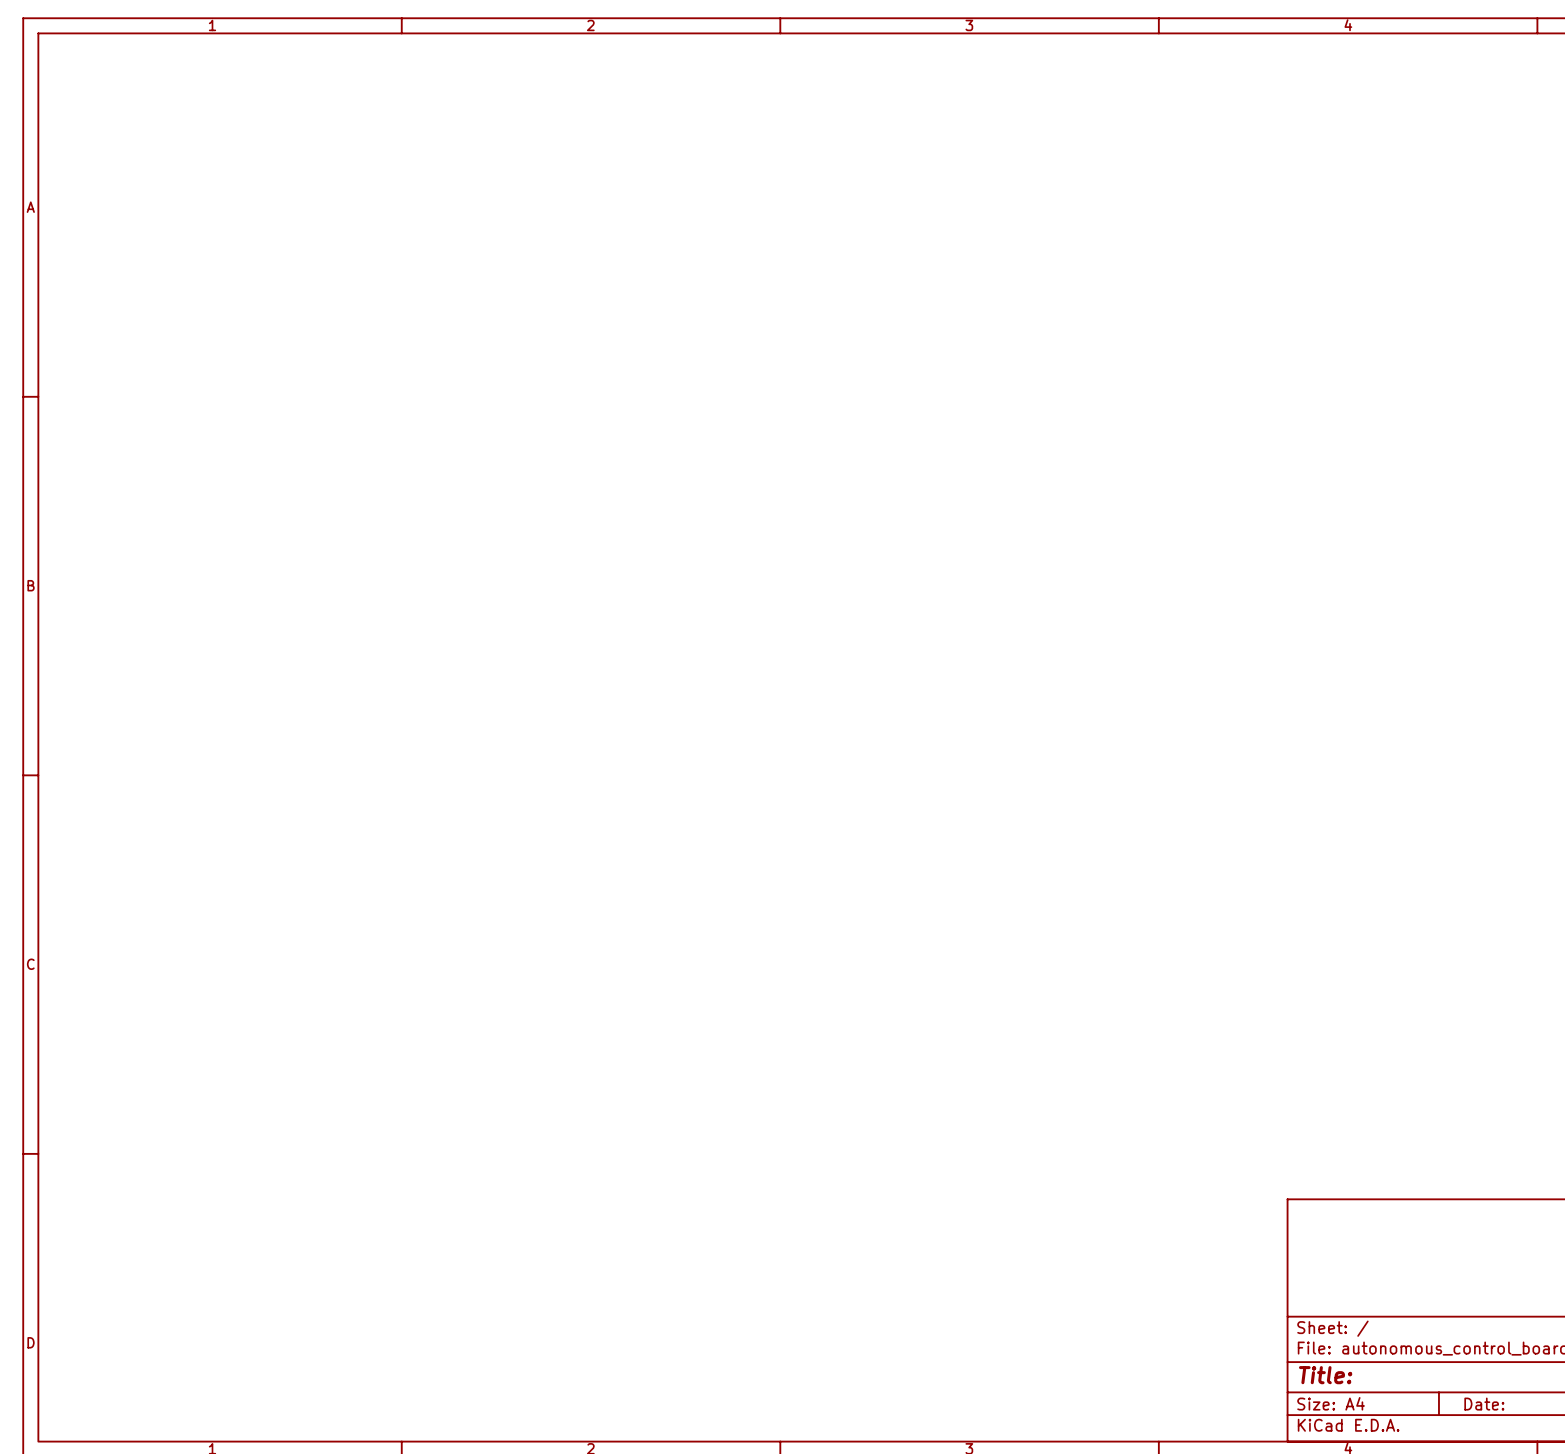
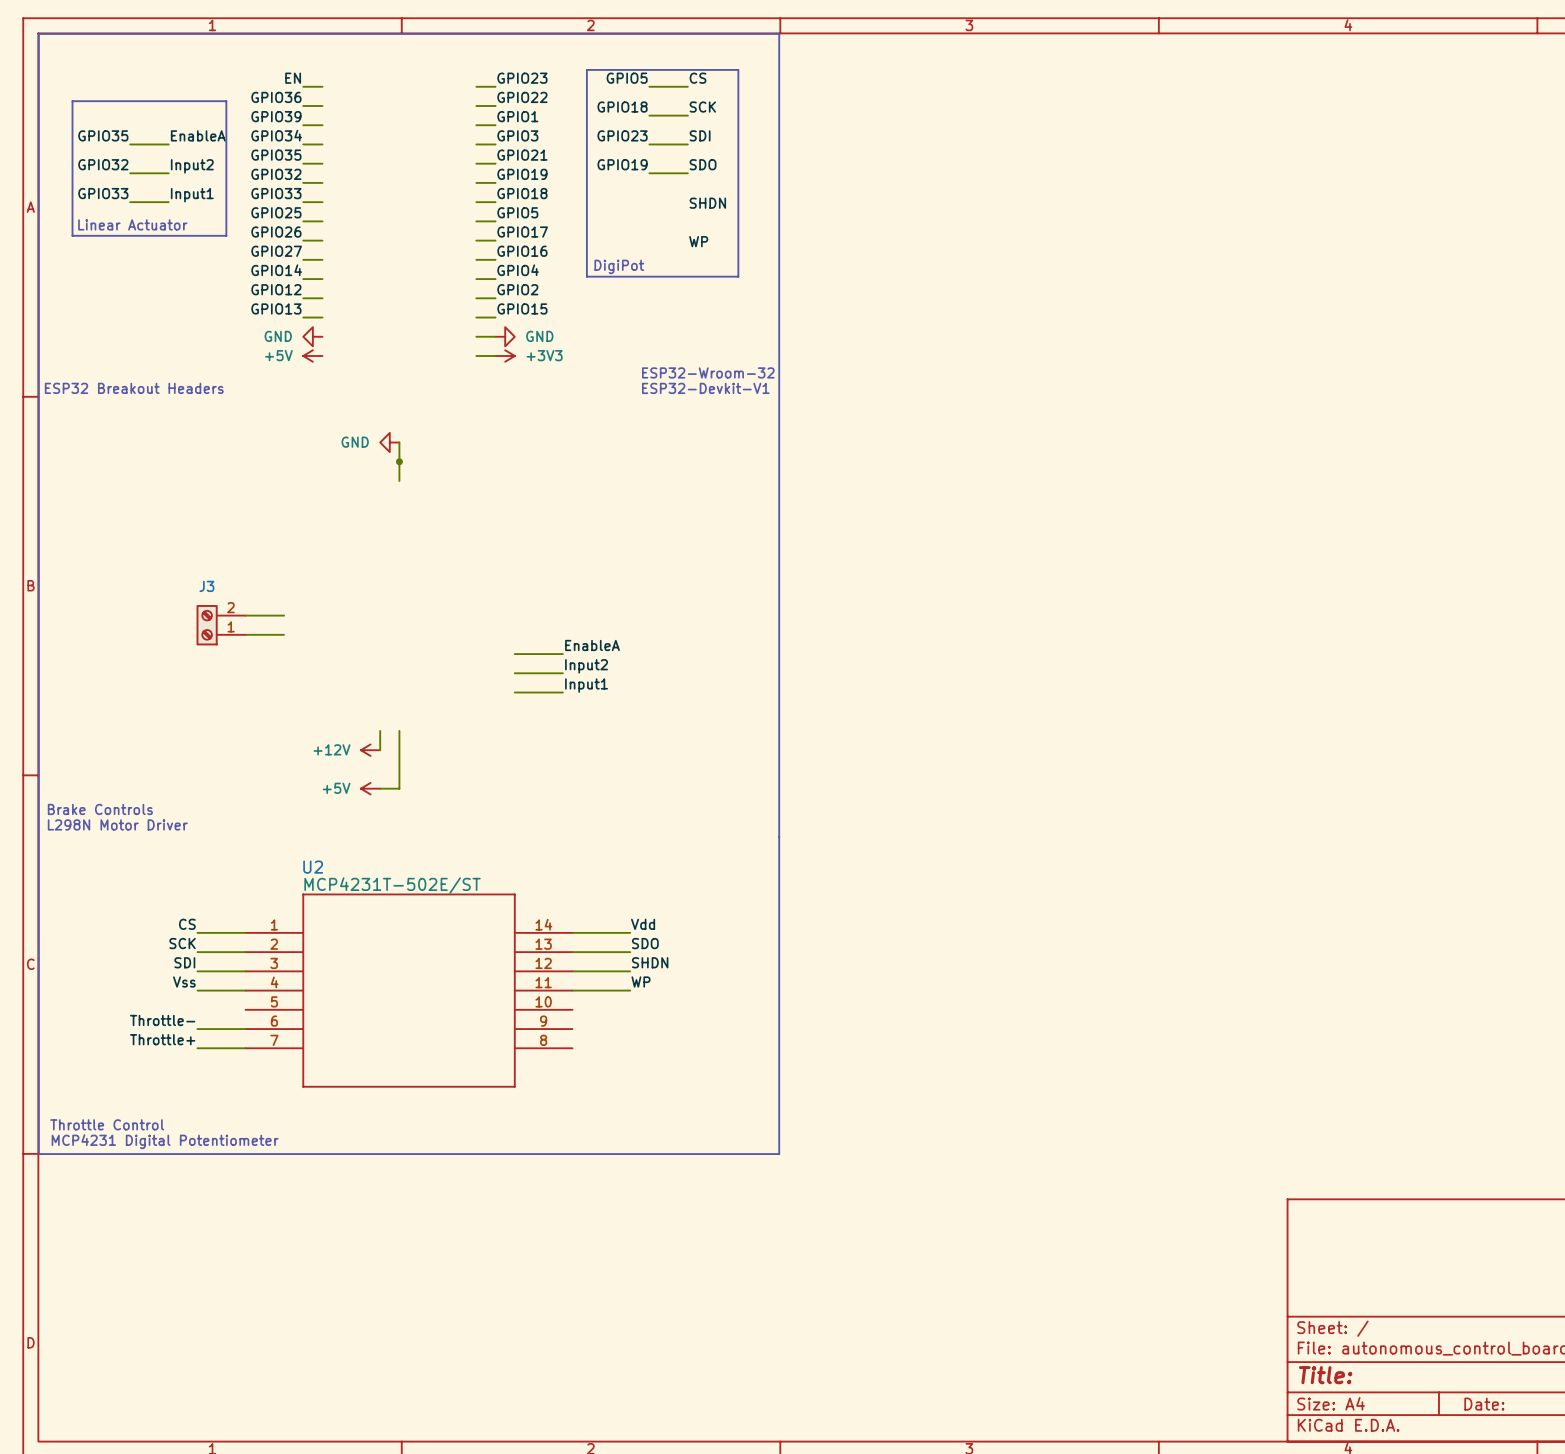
line: none -> (38, 33) (779, 33) (779, 1154) (38, 1154) (38, 33)
line: none -> (586, 69) (738, 69) (738, 276) (586, 276) (586, 69)
label: none -> EN (293, 78)
label: none -> GPIO23 (522, 78)
label: none -> GPIO5 (627, 78)
label: none -> CS (698, 78)
wire: none -> (303, 86) (322, 86)
wire: none -> (476, 86) (495, 86)
wire: none -> (649, 86) (687, 86)
label: none -> GPIO36 (276, 97)
label: none -> GPIO22 (522, 97)
line: none -> (72, 101) (226, 101) (226, 235) (72, 235) (72, 101)
wire: none -> (303, 106) (322, 106)
wire: none -> (476, 106) (495, 106)
label: none -> GPIO18 (622, 107)
label: none -> SCK (702, 107)
wire: none -> (649, 115) (687, 115)
label: none -> GPIO39 (276, 116)
label: none -> GPIO1 (517, 116)
wire: none -> (303, 125) (322, 125)
wire: none -> (476, 125) (495, 125)
label: none -> GPIO35 (103, 135)
label: none -> EnableA (198, 135)
label: none -> GPIO34 (276, 135)
label: none -> GPIO3 (517, 135)
label: none -> GPIO23 (622, 135)
label: none -> SDI (700, 135)
wire: none -> (130, 144) (168, 144)
wire: none -> (303, 144) (322, 144)
wire: none -> (476, 144) (495, 144)
wire: none -> (649, 144) (687, 144)
label: none -> GPIO35 (276, 155)
label: none -> GPIO21 (522, 155)
wire: none -> (303, 163) (322, 163)
wire: none -> (476, 163) (495, 163)
label: none -> GPIO32 (103, 164)
label: none -> GPIO19 (622, 164)
label: none -> SDO (703, 164)
label: none -> Input2 (192, 166)
wire: none -> (130, 173) (168, 173)
wire: none -> (649, 173) (687, 173)
label: none -> GPIO32 (276, 174)
label: none -> GPIO19 (522, 174)
wire: none -> (303, 182) (322, 182)
wire: none -> (476, 182) (495, 182)
label: none -> GPIO33 (103, 193)
label: none -> GPIO33 (276, 193)
label: none -> GPIO18 (522, 193)
label: none -> Input1 (192, 195)
wire: none -> (130, 202) (168, 202)
wire: none -> (303, 202) (322, 202)
wire: none -> (476, 202) (495, 202)
label: none -> SHDN (707, 203)
label: none -> GPIO25 (276, 212)
label: none -> GPIO5 (517, 212)
wire: none -> (303, 221) (322, 221)
wire: none -> (476, 221) (495, 221)
text: none -> Linear Actuator (132, 224)
label: none -> GPIO26 (276, 232)
label: none -> GPIO17 (522, 232)
wire: none -> (303, 240) (322, 240)
wire: none -> (476, 240) (495, 240)
label: none -> WP (698, 241)
label: none -> GPIO27 (276, 251)
label: none -> GPIO16 (522, 251)
wire: none -> (303, 259) (322, 259)
wire: none -> (476, 259) (495, 259)
text: none -> DigiPot (619, 266)
label: none -> GPIO14 (276, 270)
label: none -> GPIO4 (518, 270)
wire: none -> (303, 279) (322, 279)
wire: none -> (476, 279) (495, 279)
label: none -> GPIO12 (276, 289)
label: none -> GPIO2 (517, 289)
wire: none -> (303, 298) (322, 298)
wire: none -> (476, 298) (495, 298)
label: none -> GPIO13 (276, 308)
label: none -> GPIO15 (522, 308)
wire: none -> (303, 317) (322, 317)
wire: none -> (476, 317) (495, 317)
power symbol: none -> GND (312, 336)
wire: none -> (476, 336) (495, 336)
power symbol: none -> GND (505, 336)
power symbol: none -> +5V (312, 356)
wire: none -> (476, 356) (495, 356)
power symbol: none -> +3V3 (505, 356)
text: none -> ESP32-Wroom-32 (708, 372)
text: none -> ESP32 Breakout Headers (134, 388)
text: none -> ESP32-Devkit-V1 (705, 388)
power symbol: none -> GND (389, 442)
wire: none -> (399, 442) (399, 480)
junction: none -> (399, 461)
wire: none -> (245, 615) (284, 615)
J3: none -> (221, 625)
wire: none -> (245, 634) (284, 634)
label: none -> EnableA (592, 645)
wire: none -> (514, 654) (562, 654)
label: none -> Input2 (586, 666)
wire: none -> (514, 673) (562, 673)
label: none -> Input1 (586, 685)
wire: none -> (514, 692) (562, 692)
wire: none -> (380, 730) (380, 750)
wire: none -> (399, 730) (399, 788) (380, 788)
power symbol: none -> +12V (370, 750)
power symbol: none -> +5V (370, 788)
text: none -> Brake Controls (100, 809)
text: none -> L298N Motor Driver (117, 824)
label: none -> CS (187, 924)
label: none -> Vdd (643, 924)
wire: none -> (197, 932) (245, 932)
wire: none -> (572, 932) (630, 932)
label: none -> SCK (182, 943)
label: none -> SDO (645, 943)
wire: none -> (197, 952) (245, 952)
wire: none -> (572, 952) (630, 952)
label: none -> SDI (184, 962)
label: none -> SHDN (650, 962)
wire: none -> (197, 971) (245, 971)
wire: none -> (572, 971) (630, 971)
label: none -> Vss (184, 982)
label: none -> WP (641, 982)
wire: none -> (197, 990) (245, 990)
U2: none -> MCP4231T-502E/ST (409, 990)
wire: none -> (572, 990) (630, 990)
label: none -> Throttle- (162, 1020)
wire: none -> (197, 1029) (245, 1029)
label: none -> Throttle+ (162, 1039)
wire: none -> (197, 1048) (245, 1048)
text: none -> Throttle Control (107, 1124)
text: none -> MCP4231 Digital Potentiometer (165, 1141)

